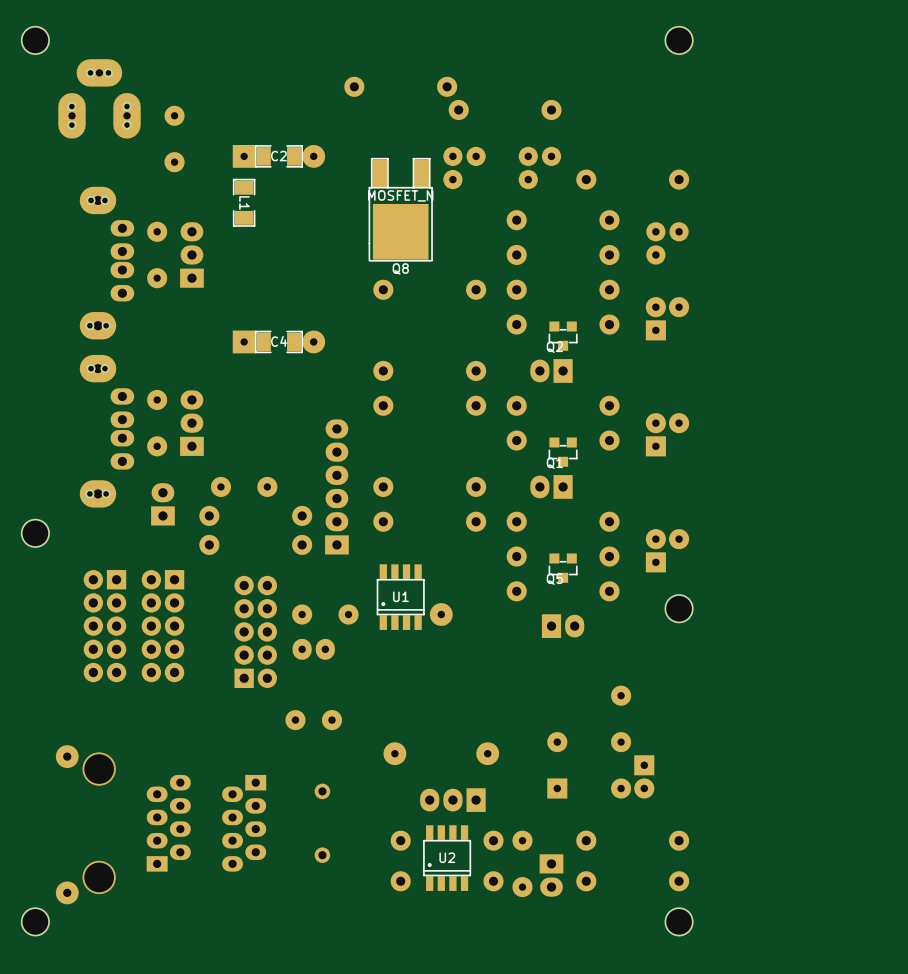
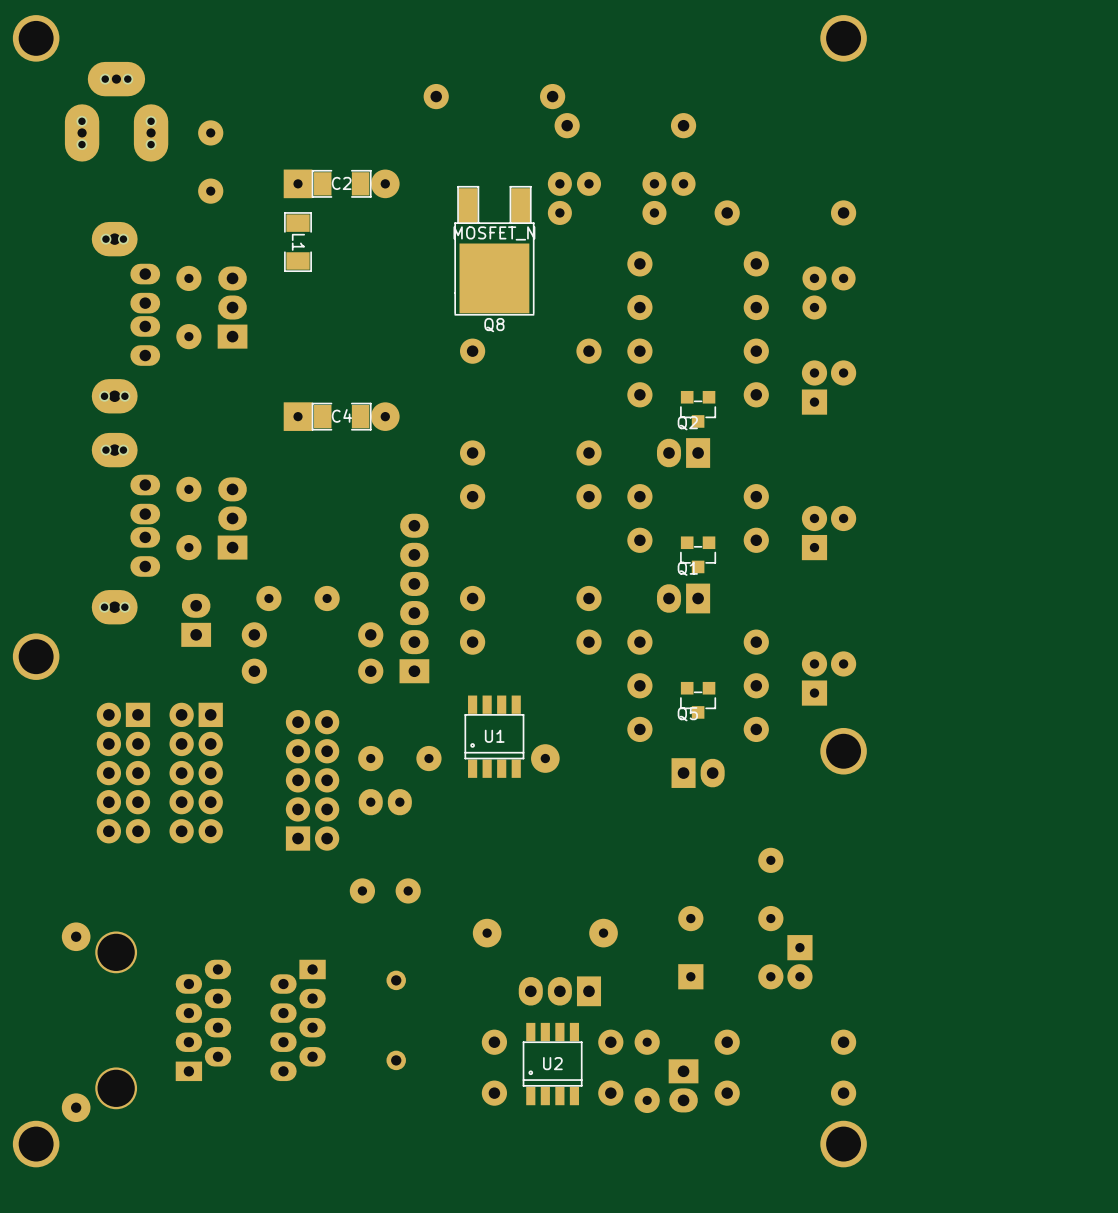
part footprint: [21, 26, 50, 55] -> [12, 15, 60, 62]
part footprint: [665, 26, 693, 55] -> [820, 15, 867, 62]
part footprint: [21, 519, 50, 548] -> [12, 633, 60, 680]
part footprint: [665, 595, 693, 623] -> [820, 727, 867, 775]
part footprint: [21, 908, 50, 936] -> [12, 1120, 60, 1168]
part footprint: [665, 908, 693, 936] -> [820, 1120, 867, 1168]

